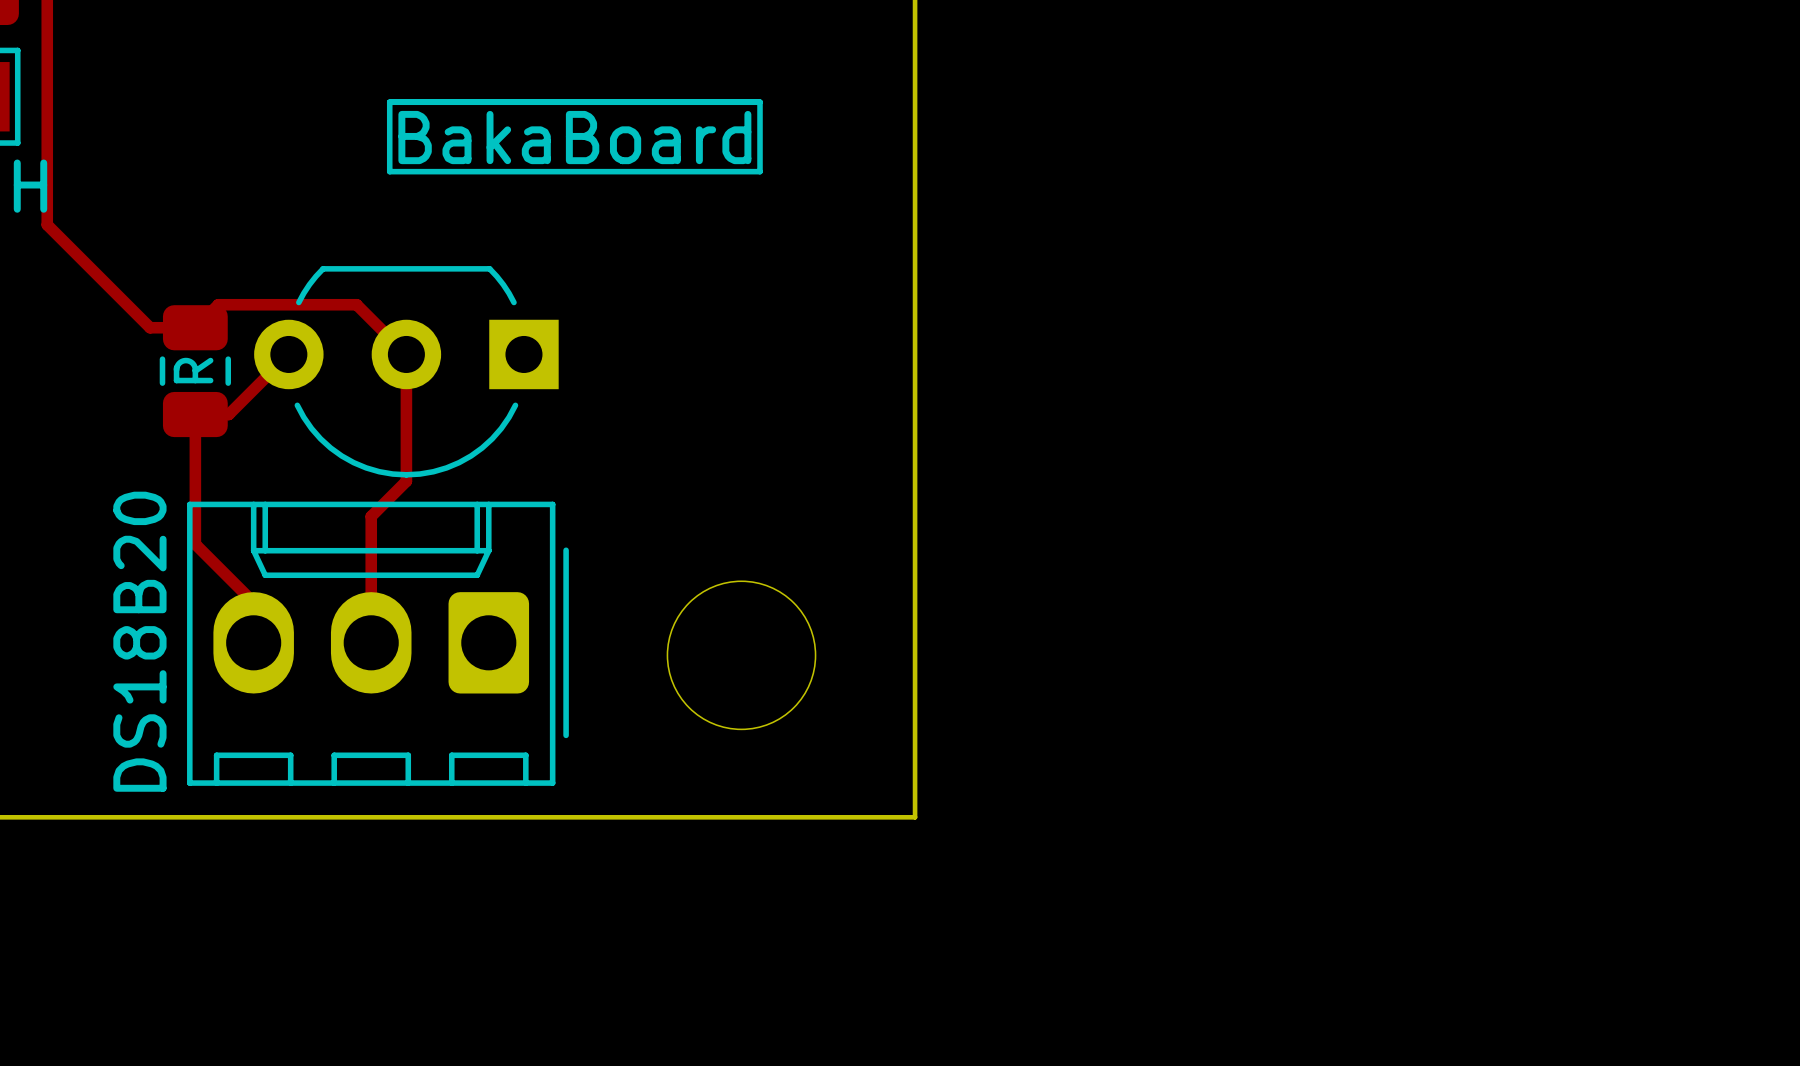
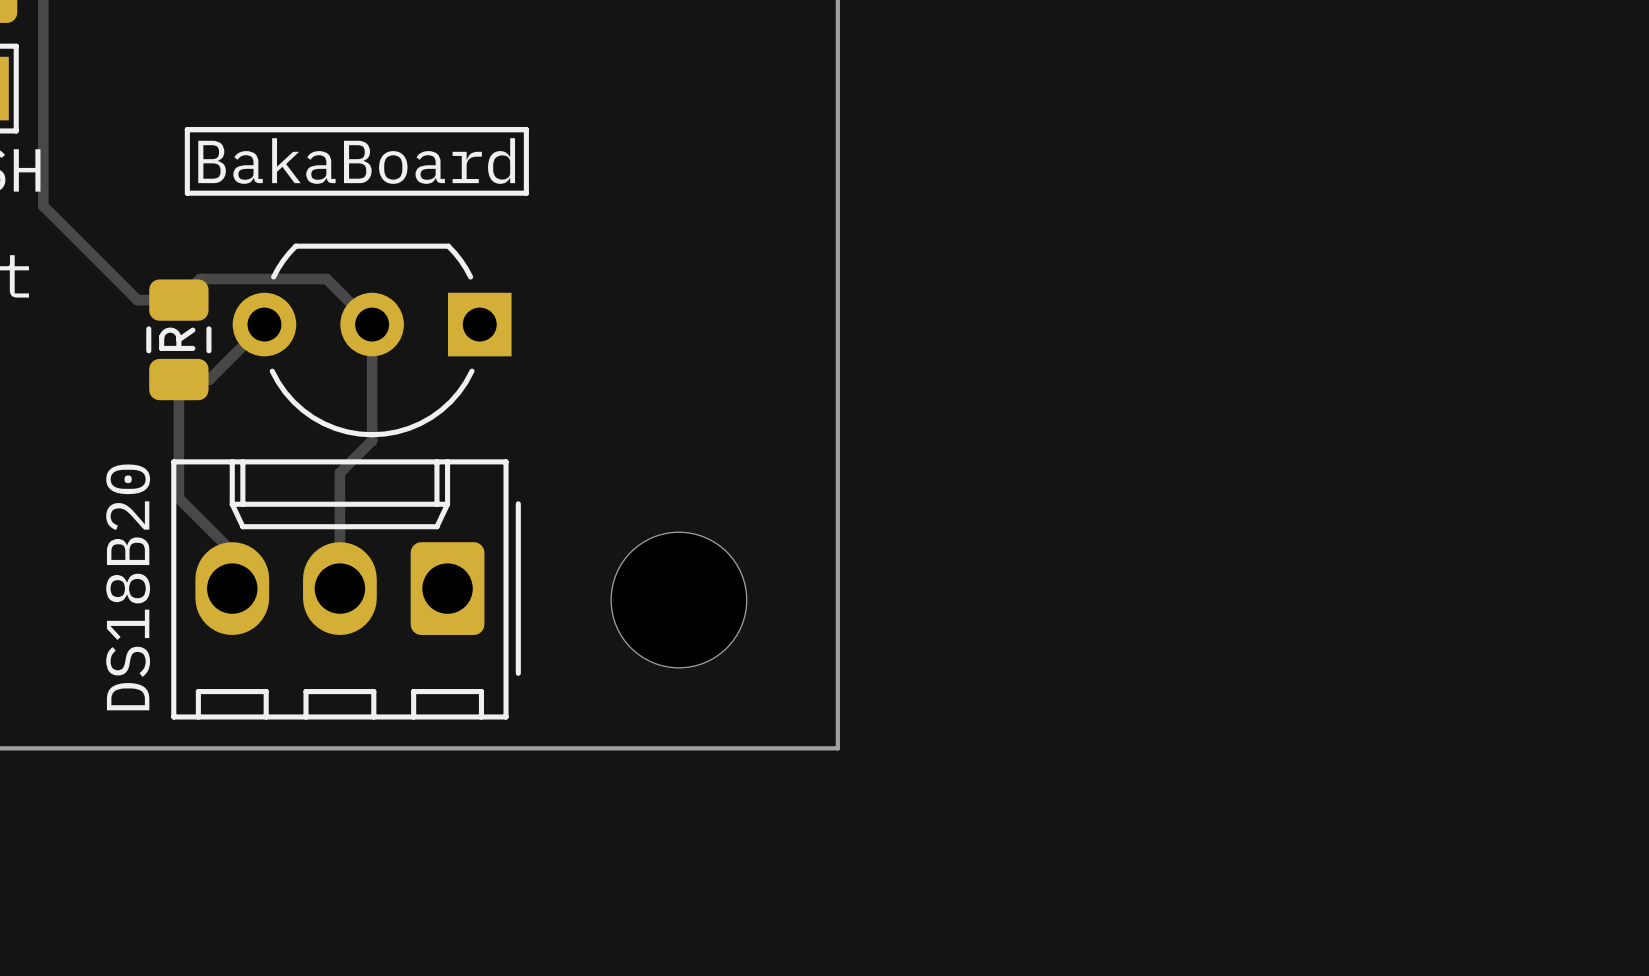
line: (389, 102) (389, 171) (760, 171) (760, 102) (389, 102) -> (187, 129) (187, 193) (526, 193) (526, 129) (187, 129)
text position: BakaBoard (574, 137) -> BakaBoard (356, 161)

